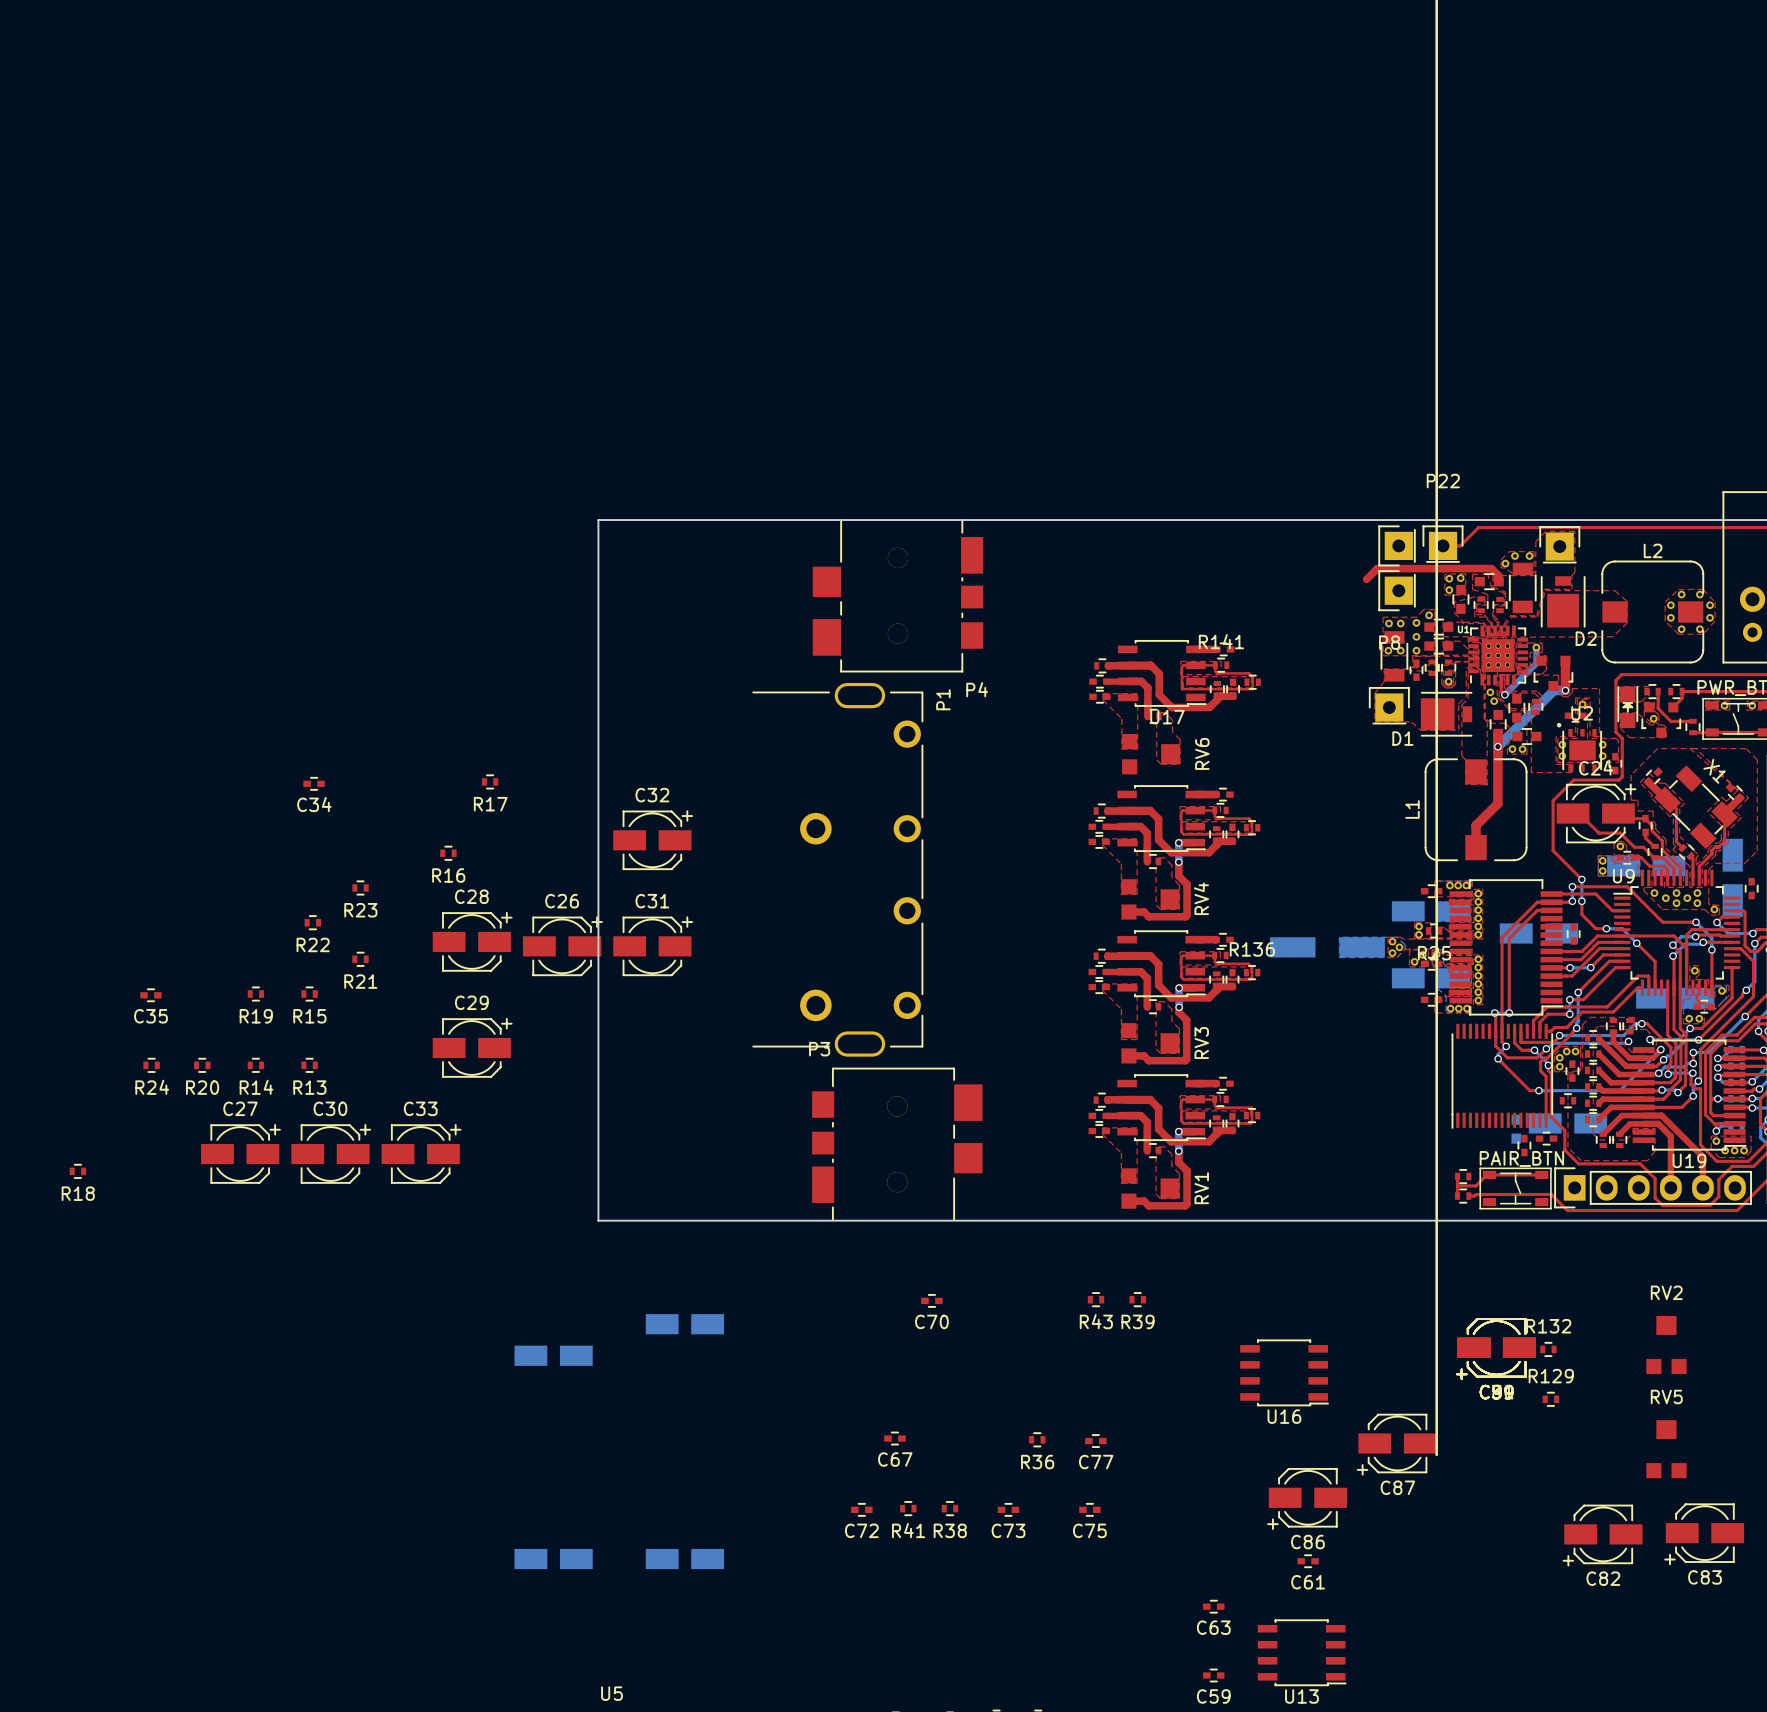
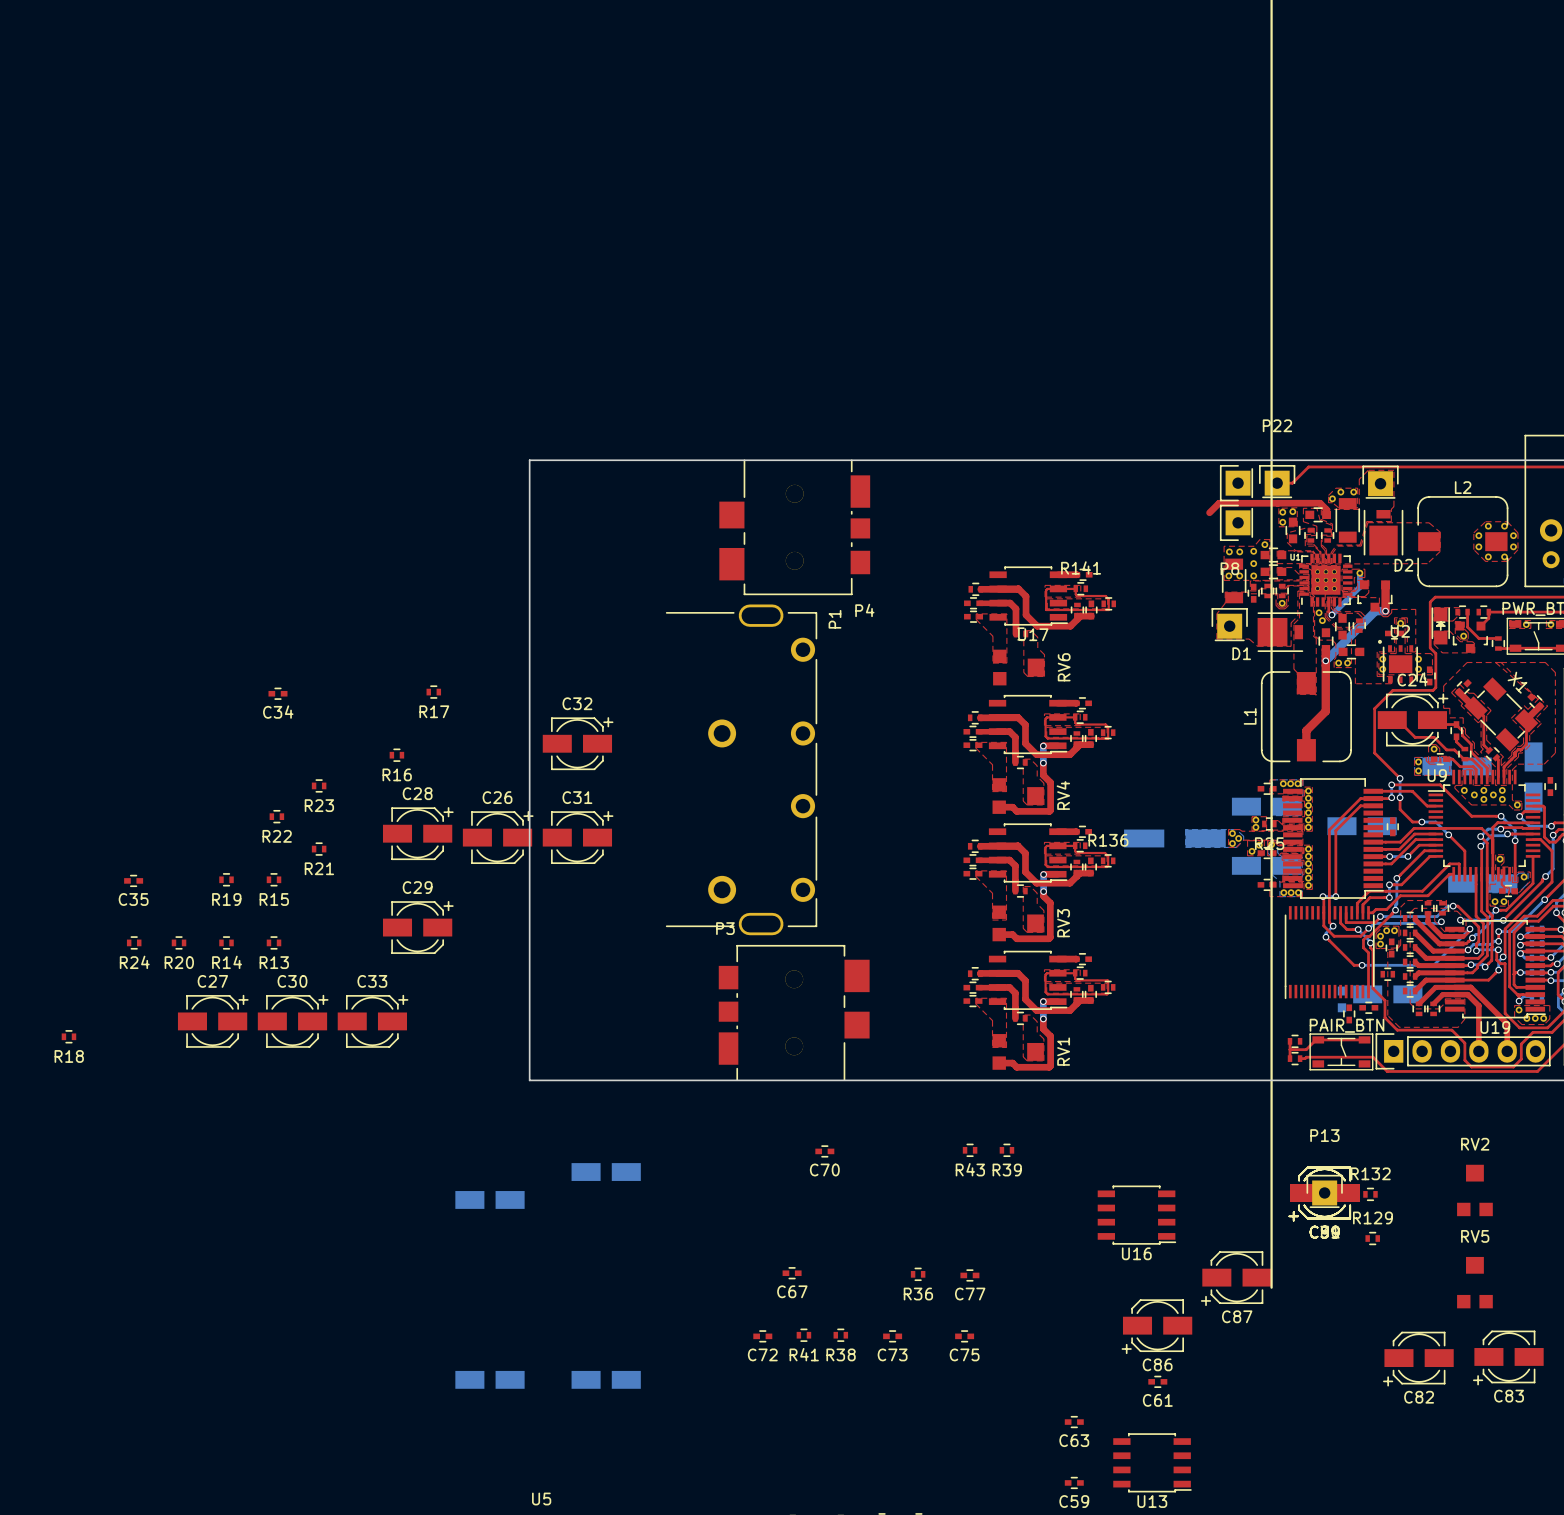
P13: none -> (1324, 1191)

